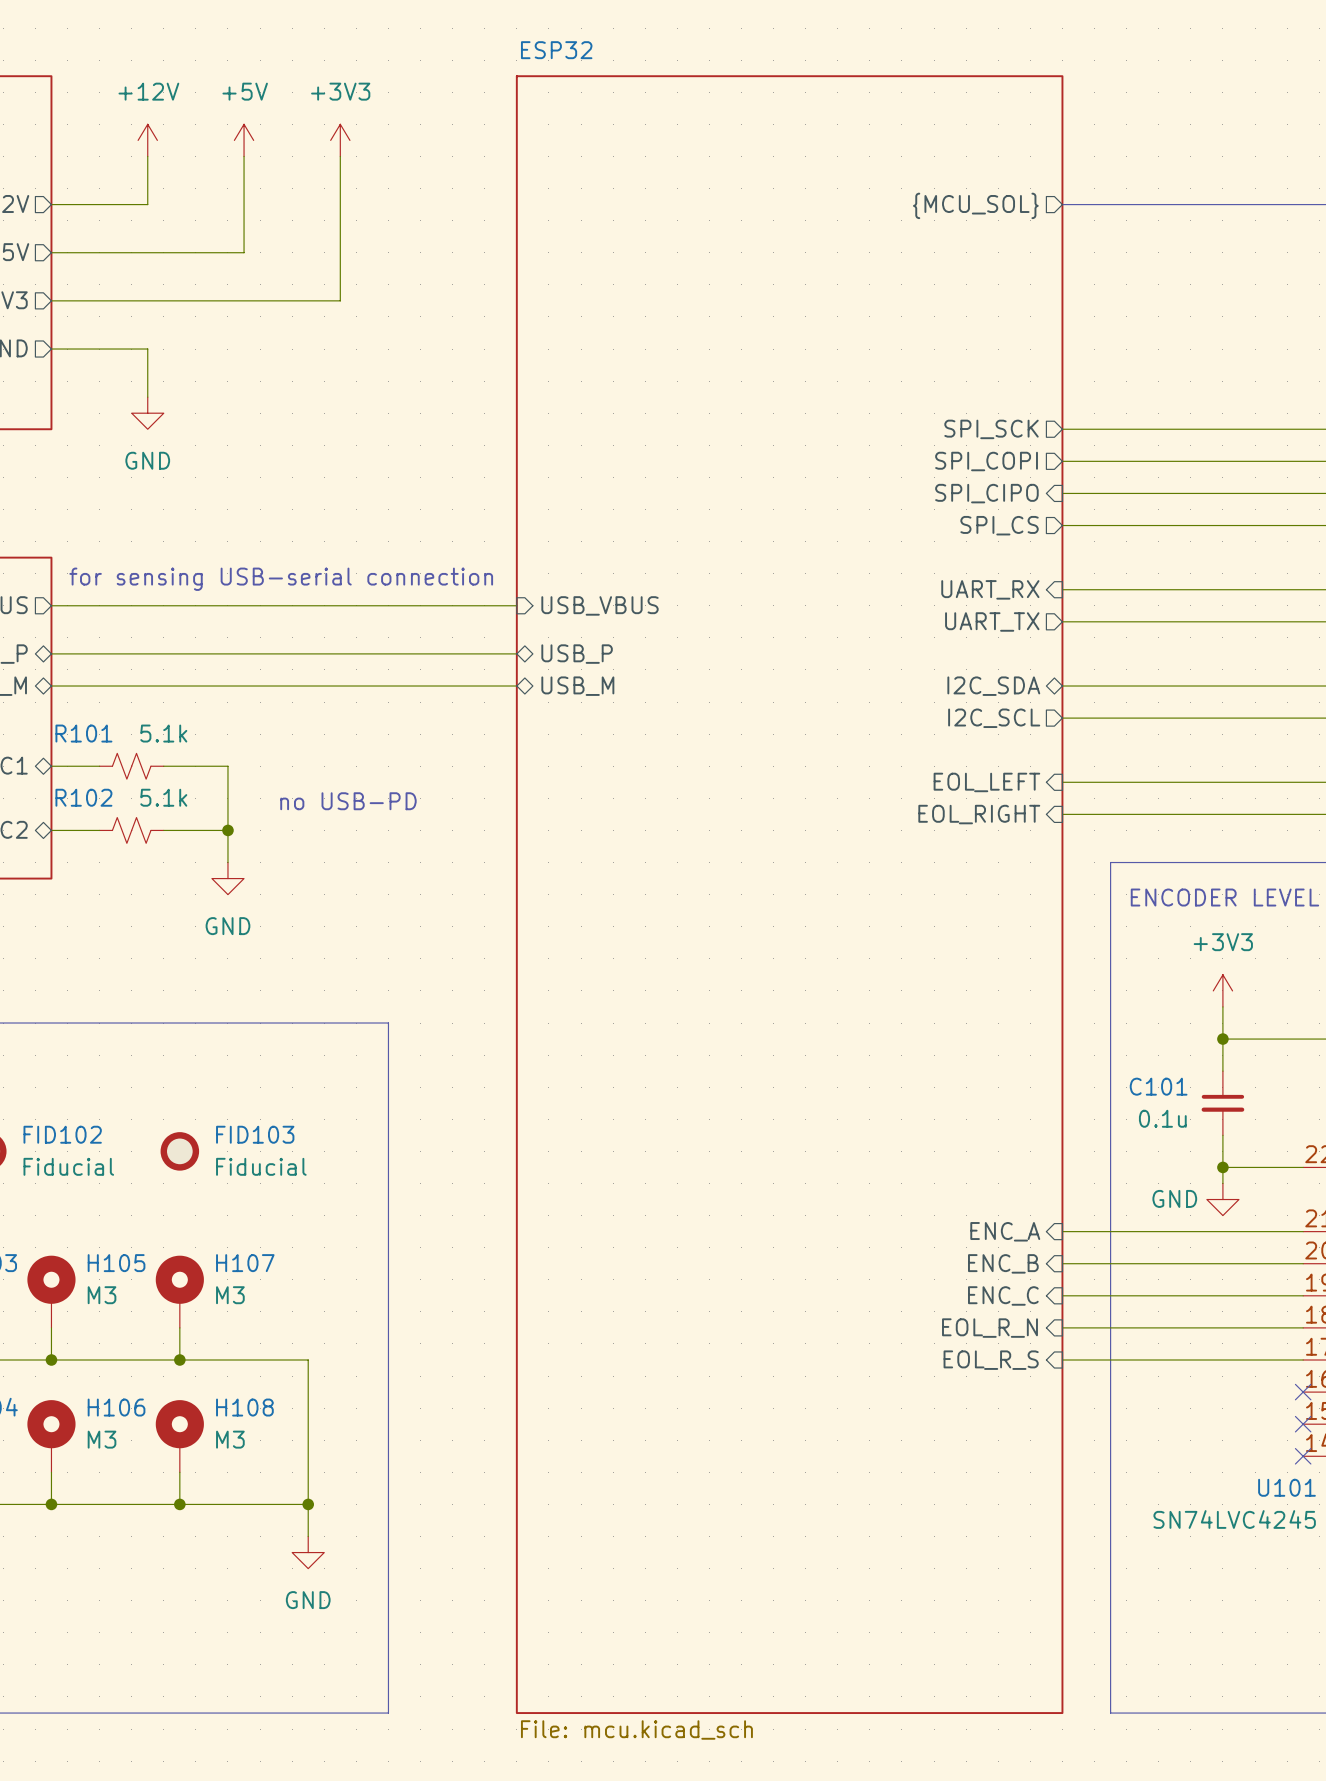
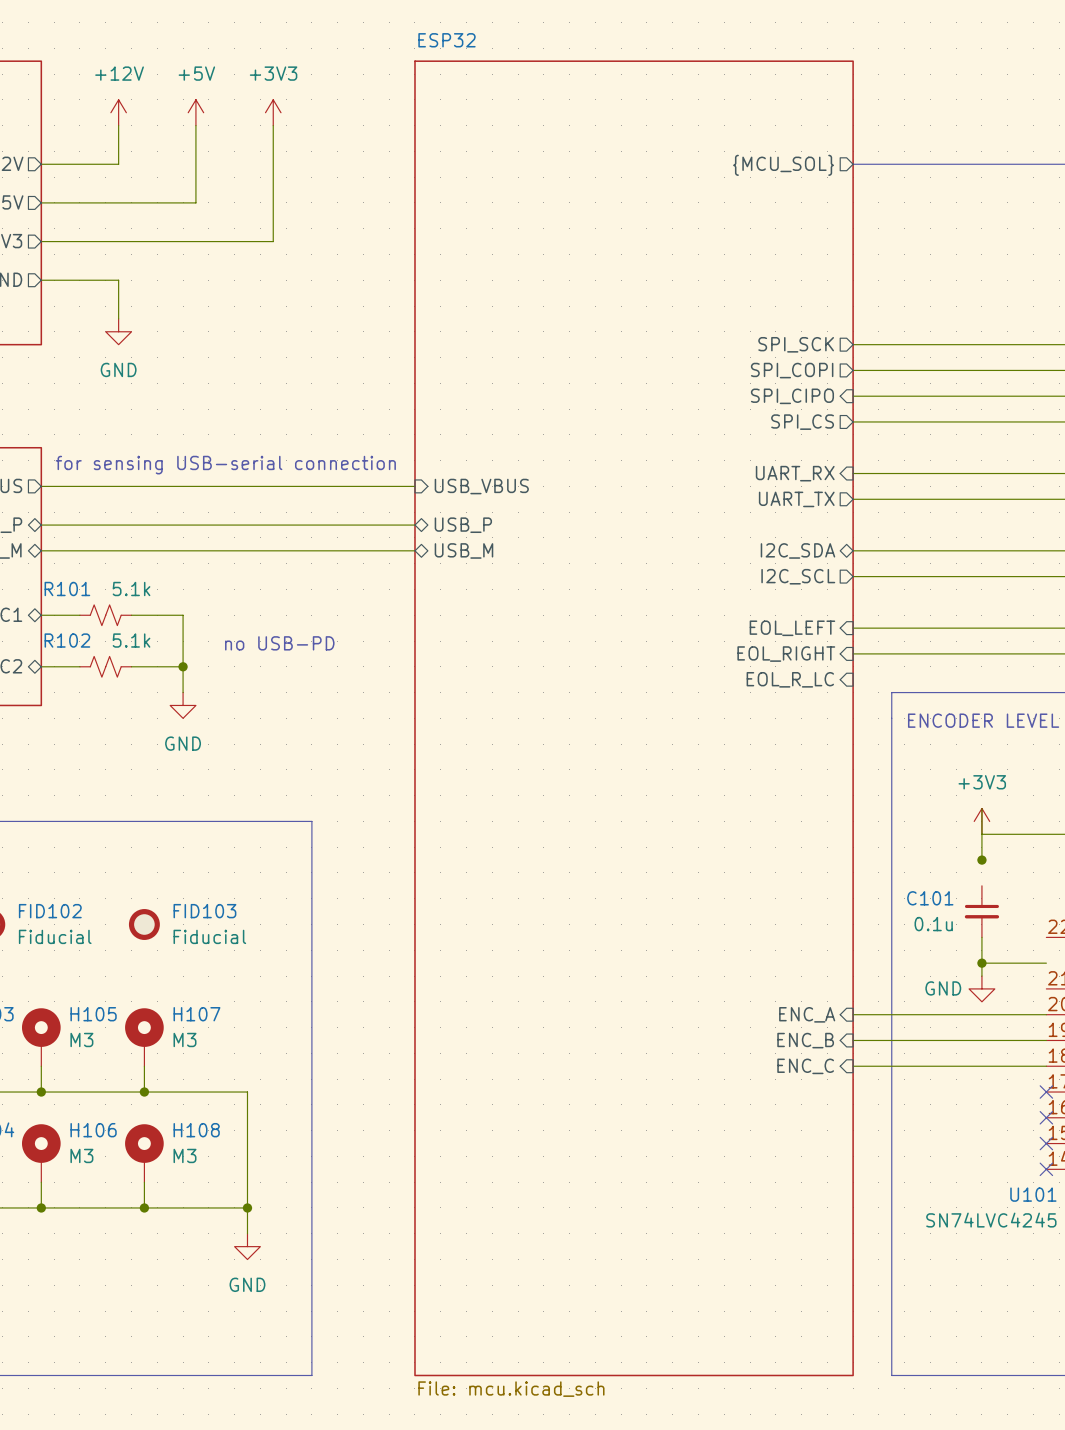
sheet pin: none -> EOL_R_LC (790, 679)
power symbol position: +3V3 (1222, 990) -> +3V3 (981, 821)
junction position: (1222, 1039) -> (981, 860)
C101 position: (1222, 1103) -> (981, 911)
wire: (1222, 1135) (1222, 1167) (1303, 1167) -> none
junction position: (1222, 1167) -> (981, 963)
wire: none -> (981, 963) (1046, 963)
power symbol position: GND (1222, 1199) -> GND (981, 988)
sheet pin: ENC_A (1005, 1231) -> none
wire: (1062, 1231) (1303, 1231) -> none
sheet pin: ENC_B (1003, 1263) -> ENC_A (807, 1014)
sheet pin: ENC_C (1003, 1295) -> ENC_B (805, 1040)
sheet pin: EOL_R_N (989, 1328) -> ENC_C (805, 1066)
sheet pin: EOL_R_S (991, 1360) -> none
wire: (1062, 1360) (1303, 1360) -> none
no-connect mark: none -> (1046, 1092)

